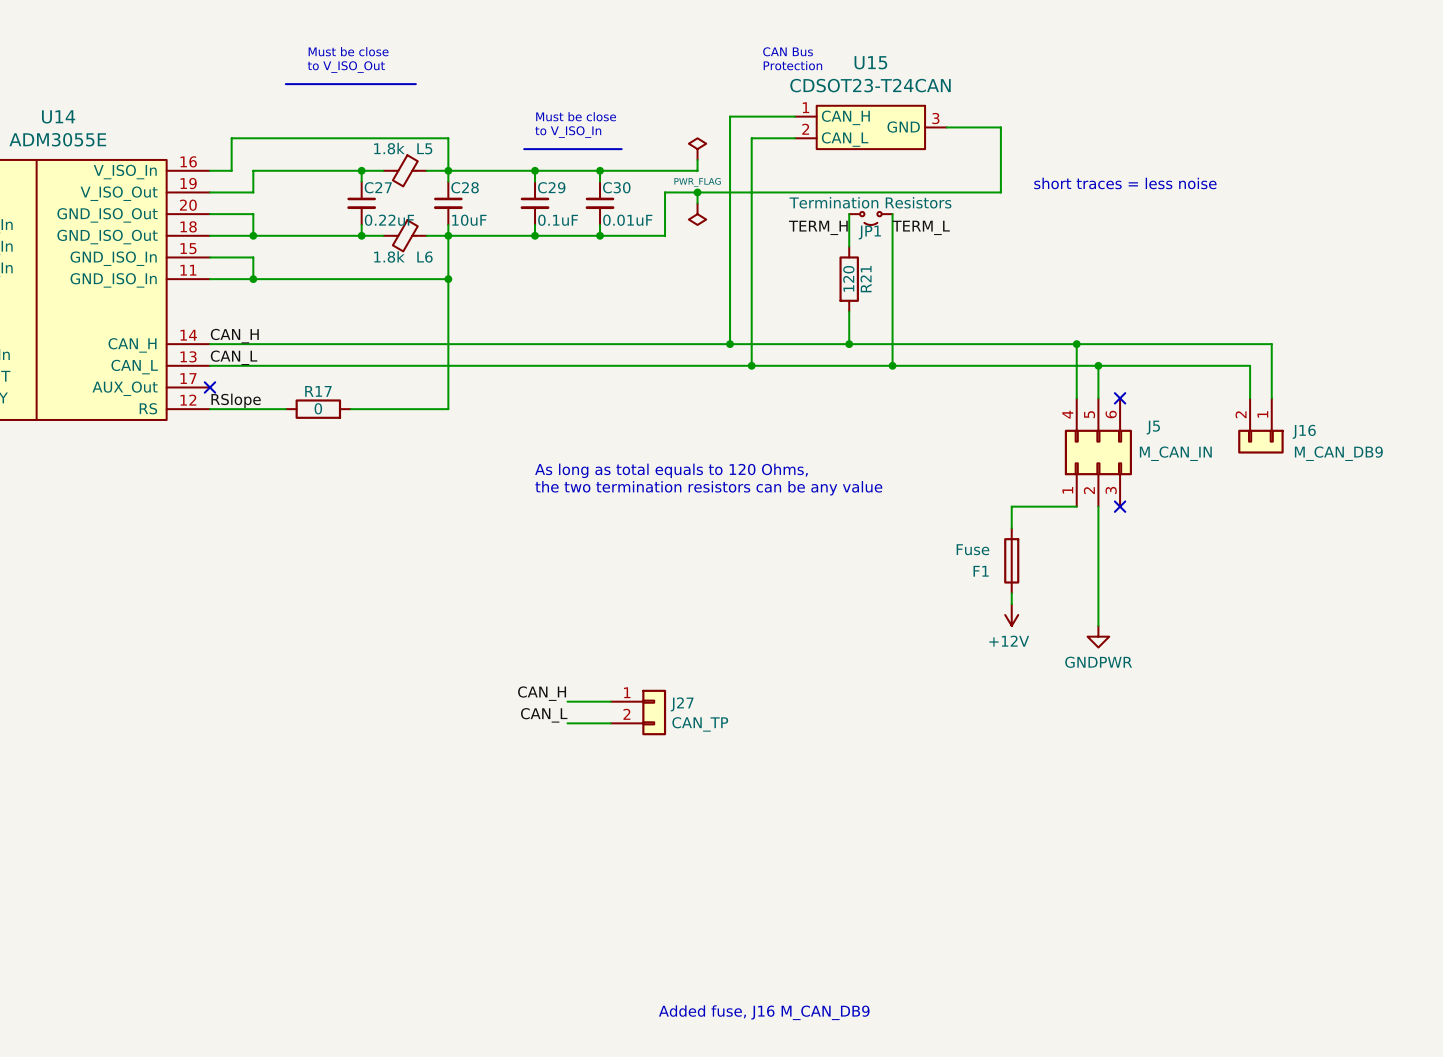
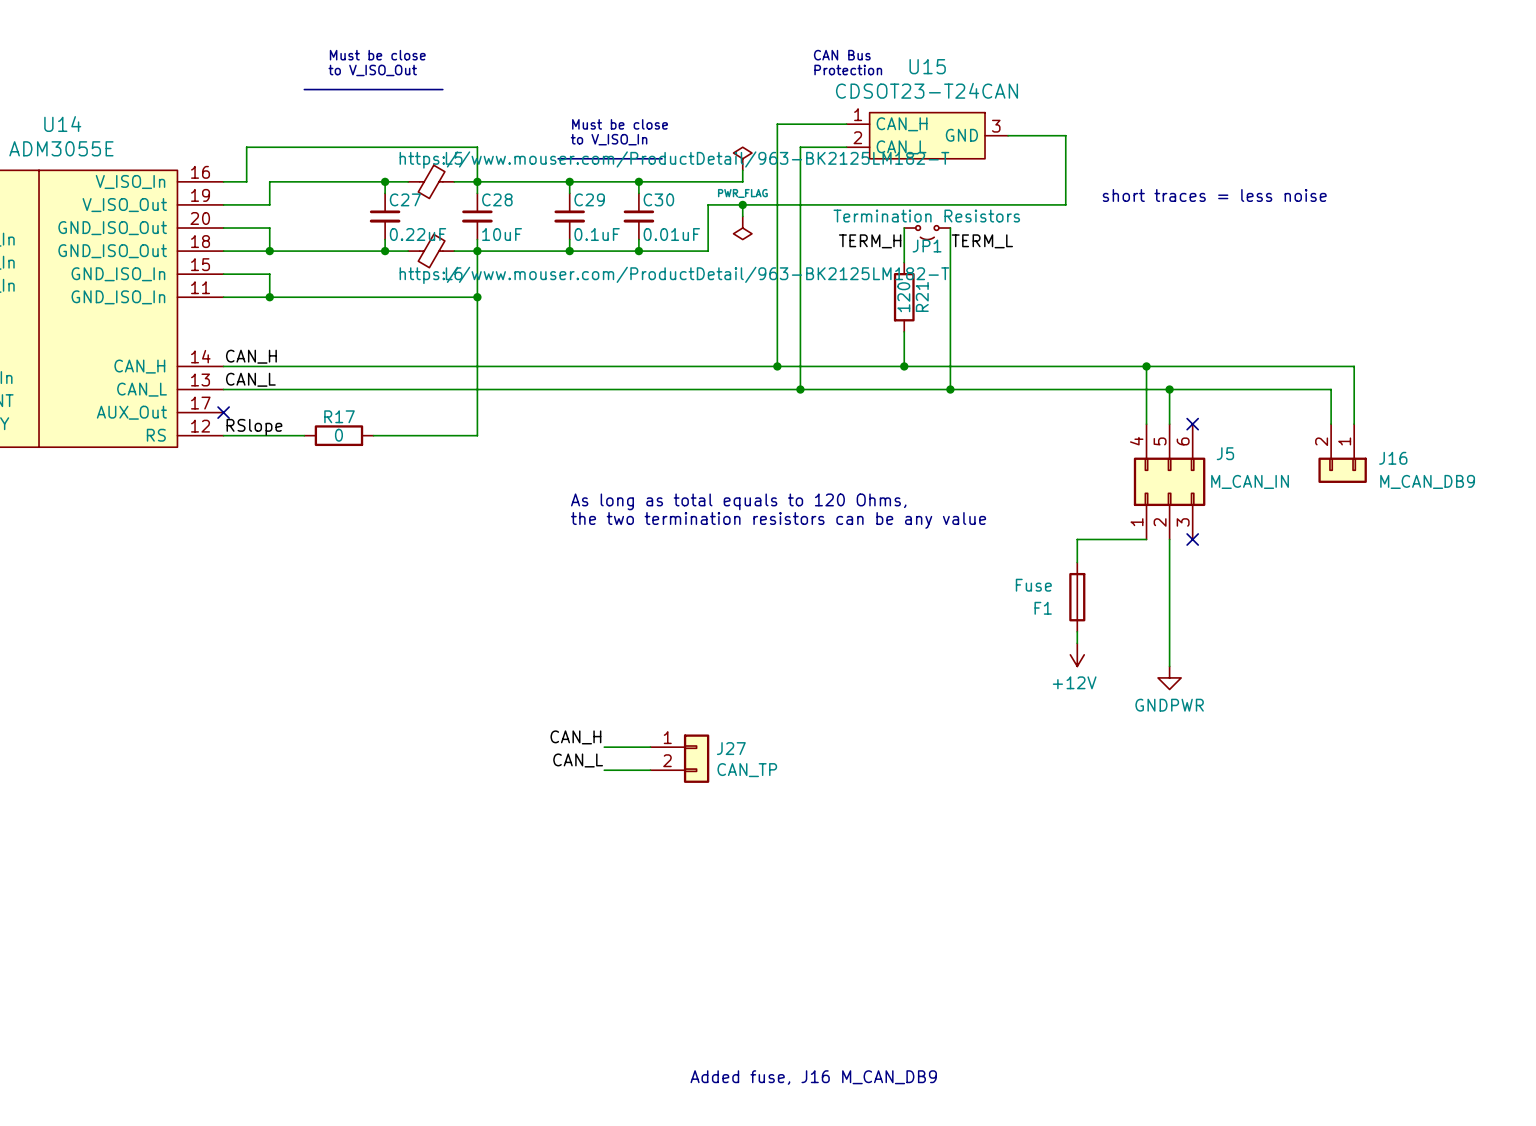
L5 value: 1.8k (389, 148) -> https://www.mouser.com/ProductDetail/963-BK2125LM182-T (674, 160)
L6 value: 1.8k (389, 256) -> https://www.mouser.com/ProductDetail/963-BK2125LM182-T (674, 275)

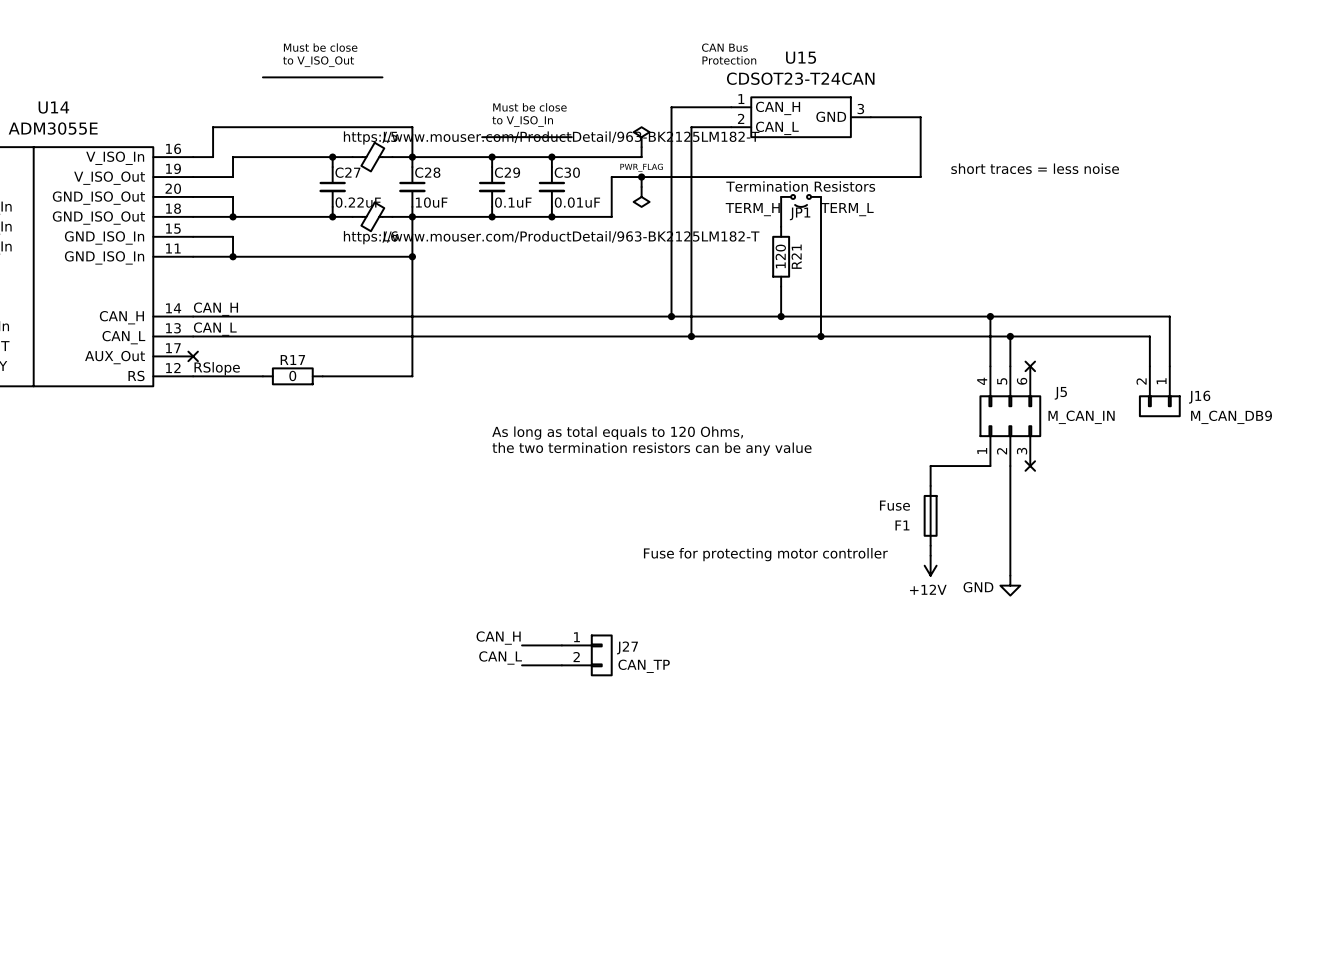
text: none -> Fuse for protecting motor controller (765, 554)
power symbol: GNDPWR (1169, 677) -> GND (1010, 585)
text: Added fuse, J16 M_CAN_DB9 (813, 1077) -> none

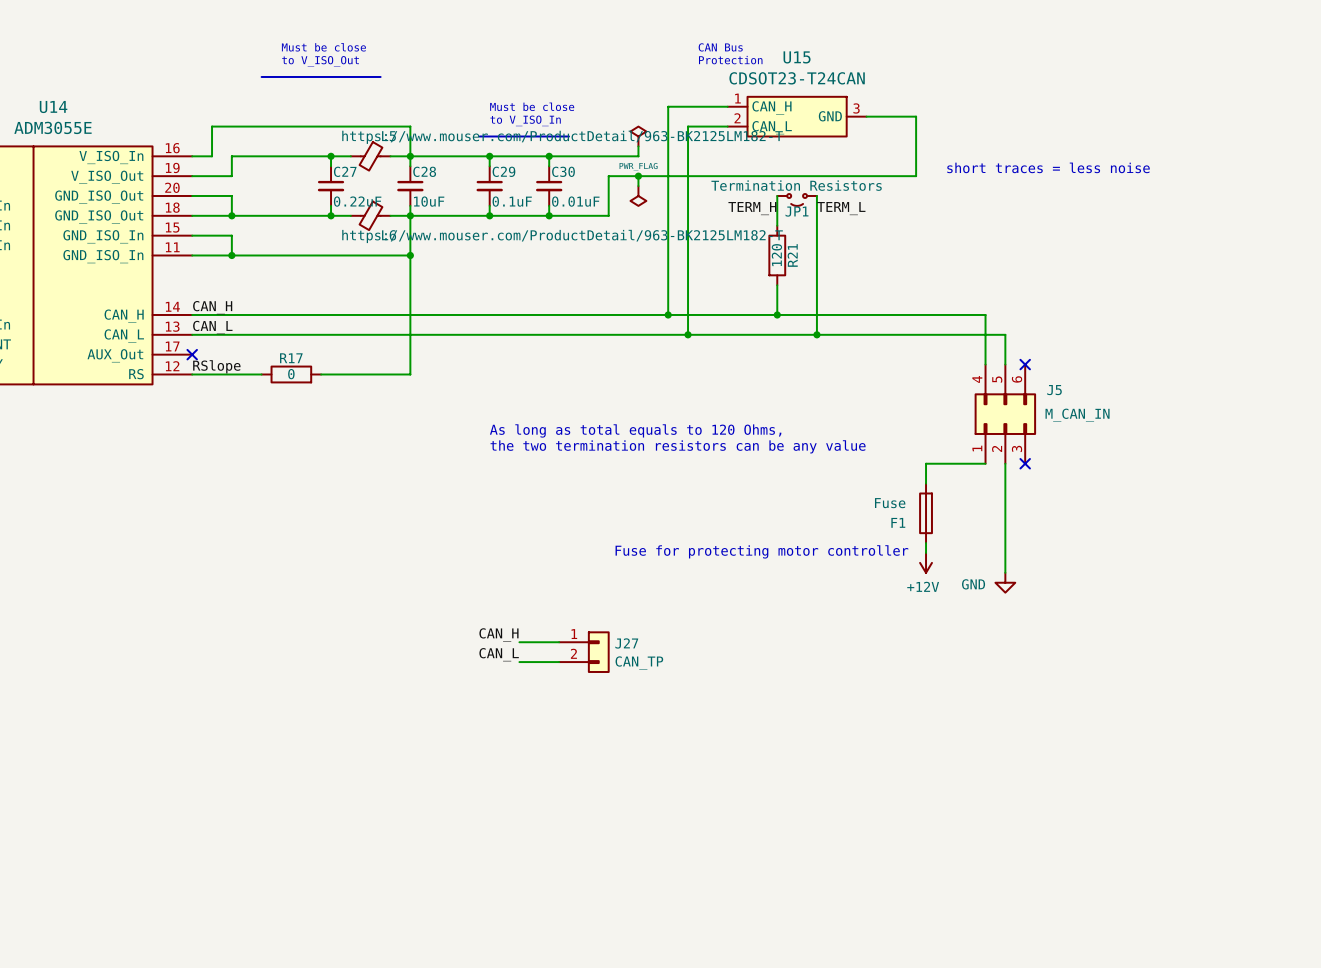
wire: (990, 316) (1169, 316) (1169, 366) -> none
junction: (990, 316) -> none
wire: (1010, 336) (1149, 336) (1149, 366) -> none
junction: (1010, 336) -> none
J16: M_CAN_DB9 (1159, 391) -> none

